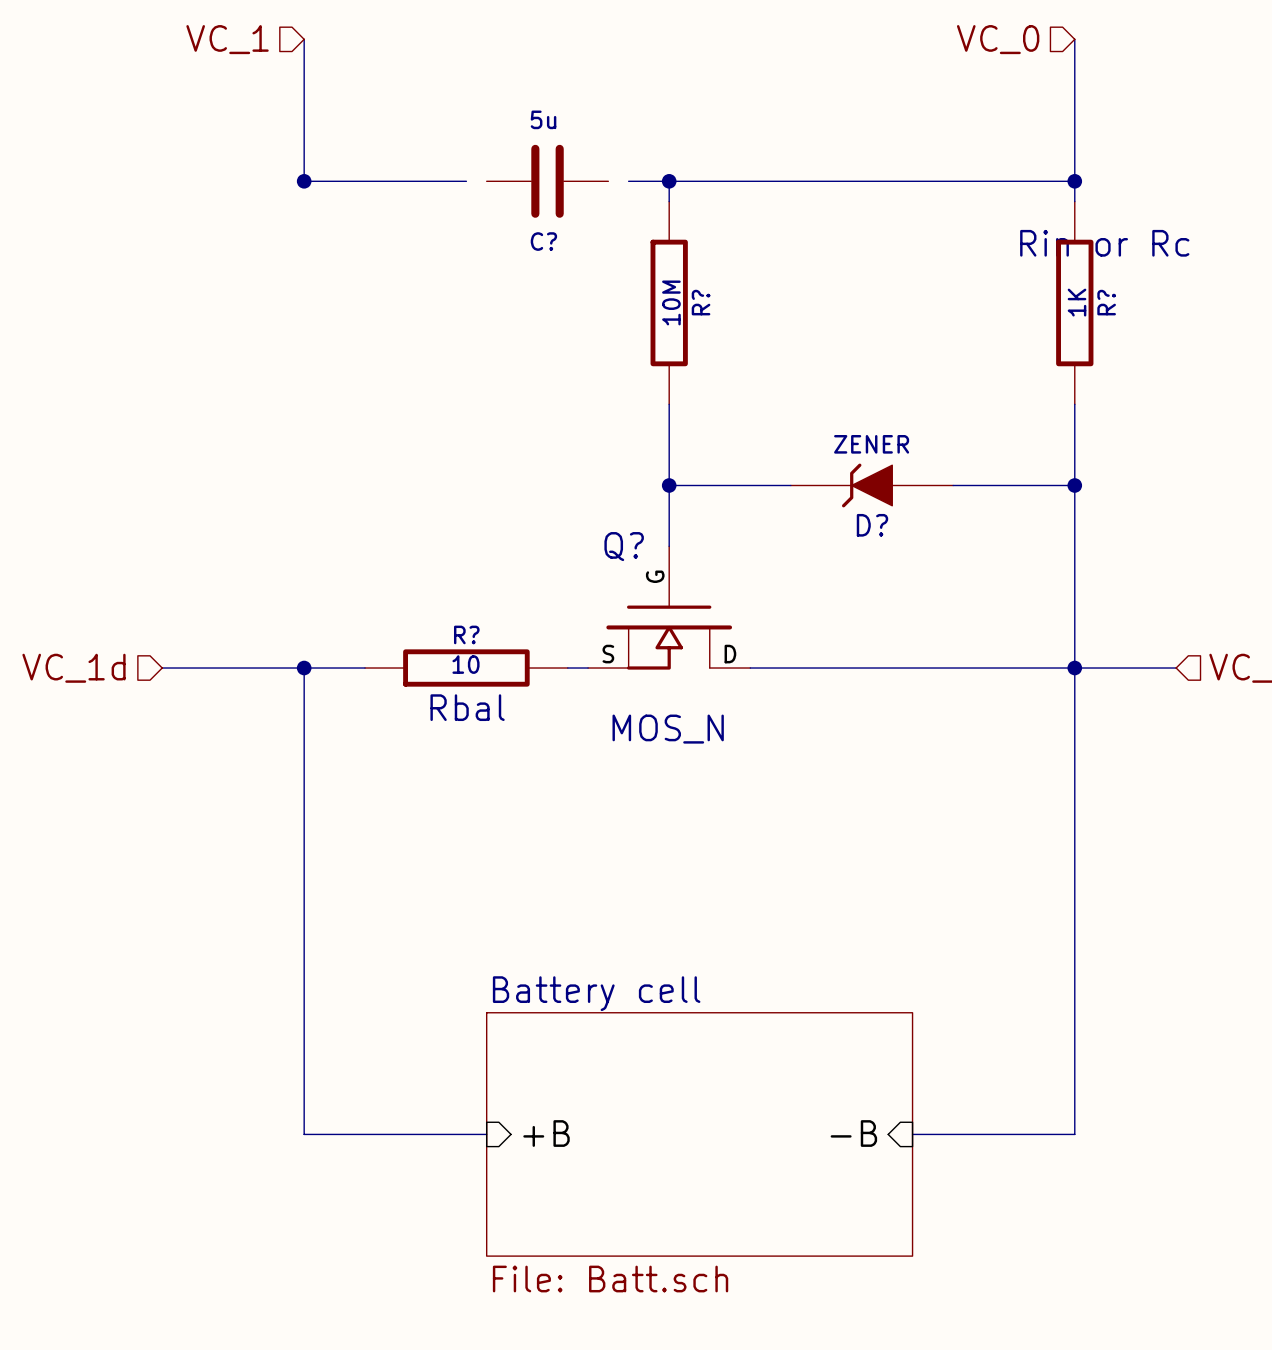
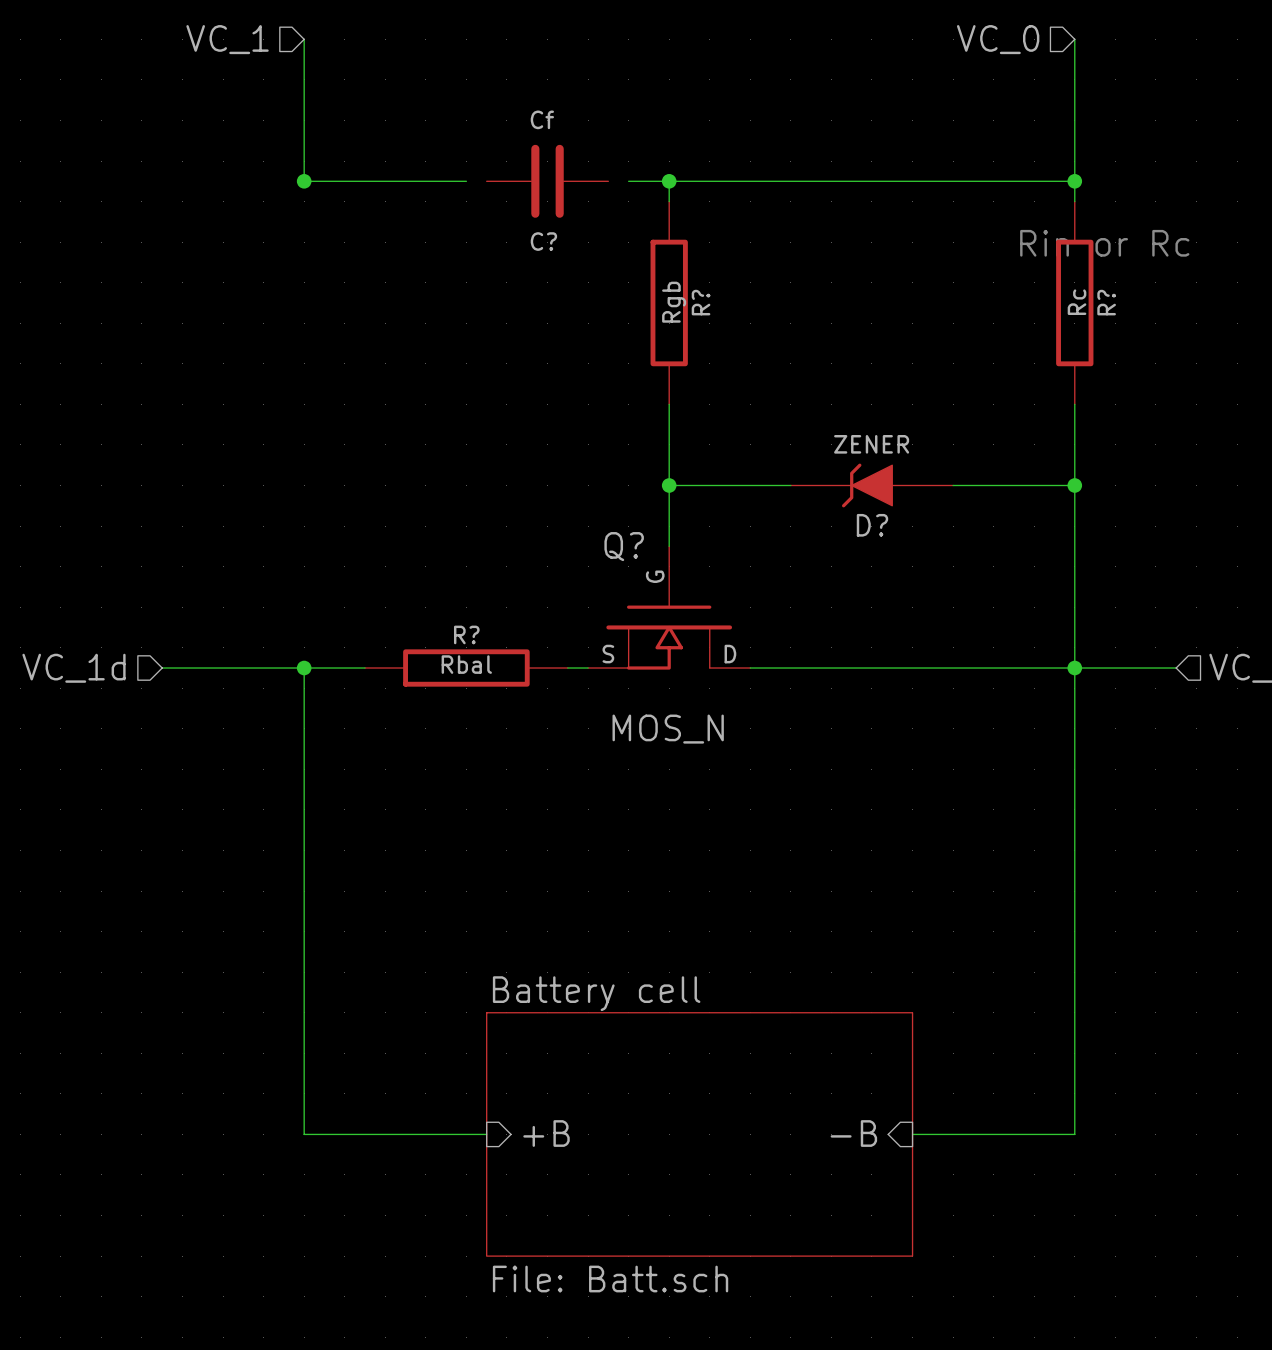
C? value: 5u (543, 119) -> Cf (542, 119)
R? value: 10M (671, 302) -> Rgb (674, 302)
R? value: 1K (1077, 302) -> Rc (1077, 302)
R? value: 10 (466, 664) -> Rbal (466, 664)
R? text: Rbal (467, 707) -> none

